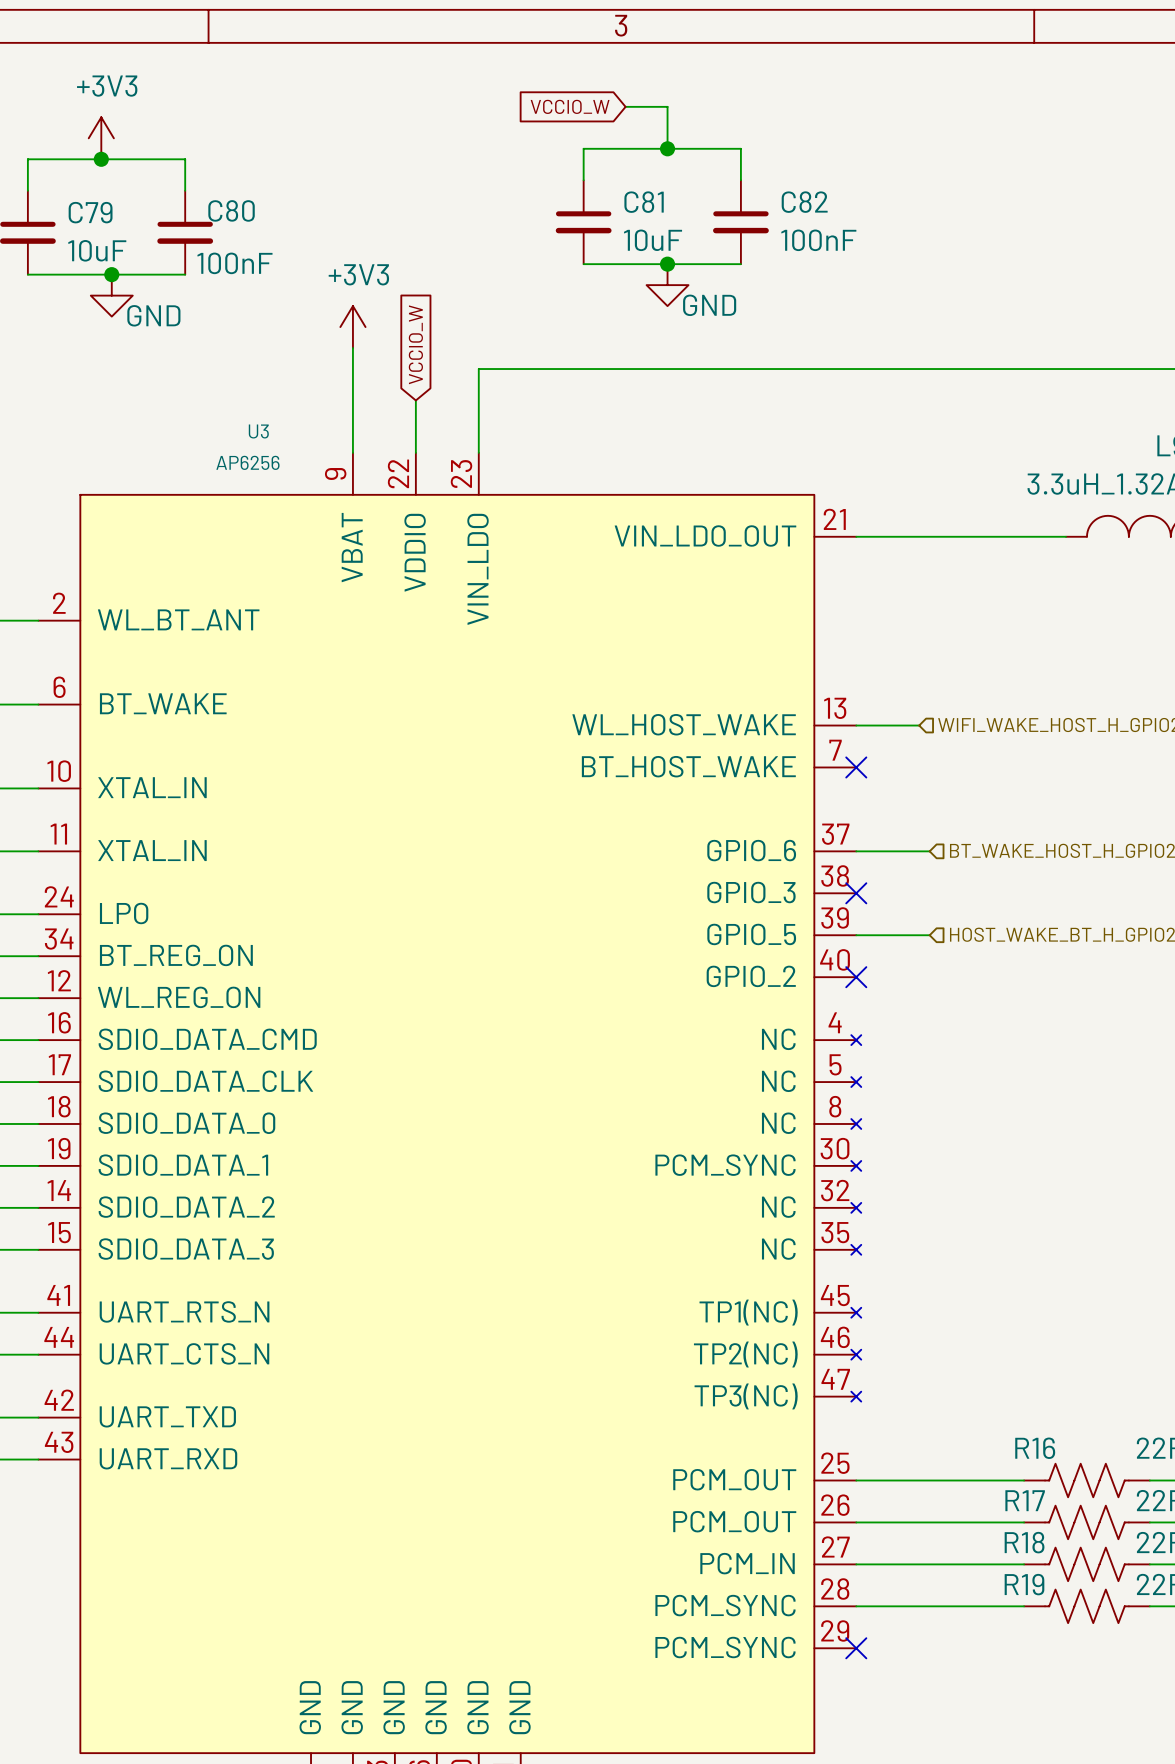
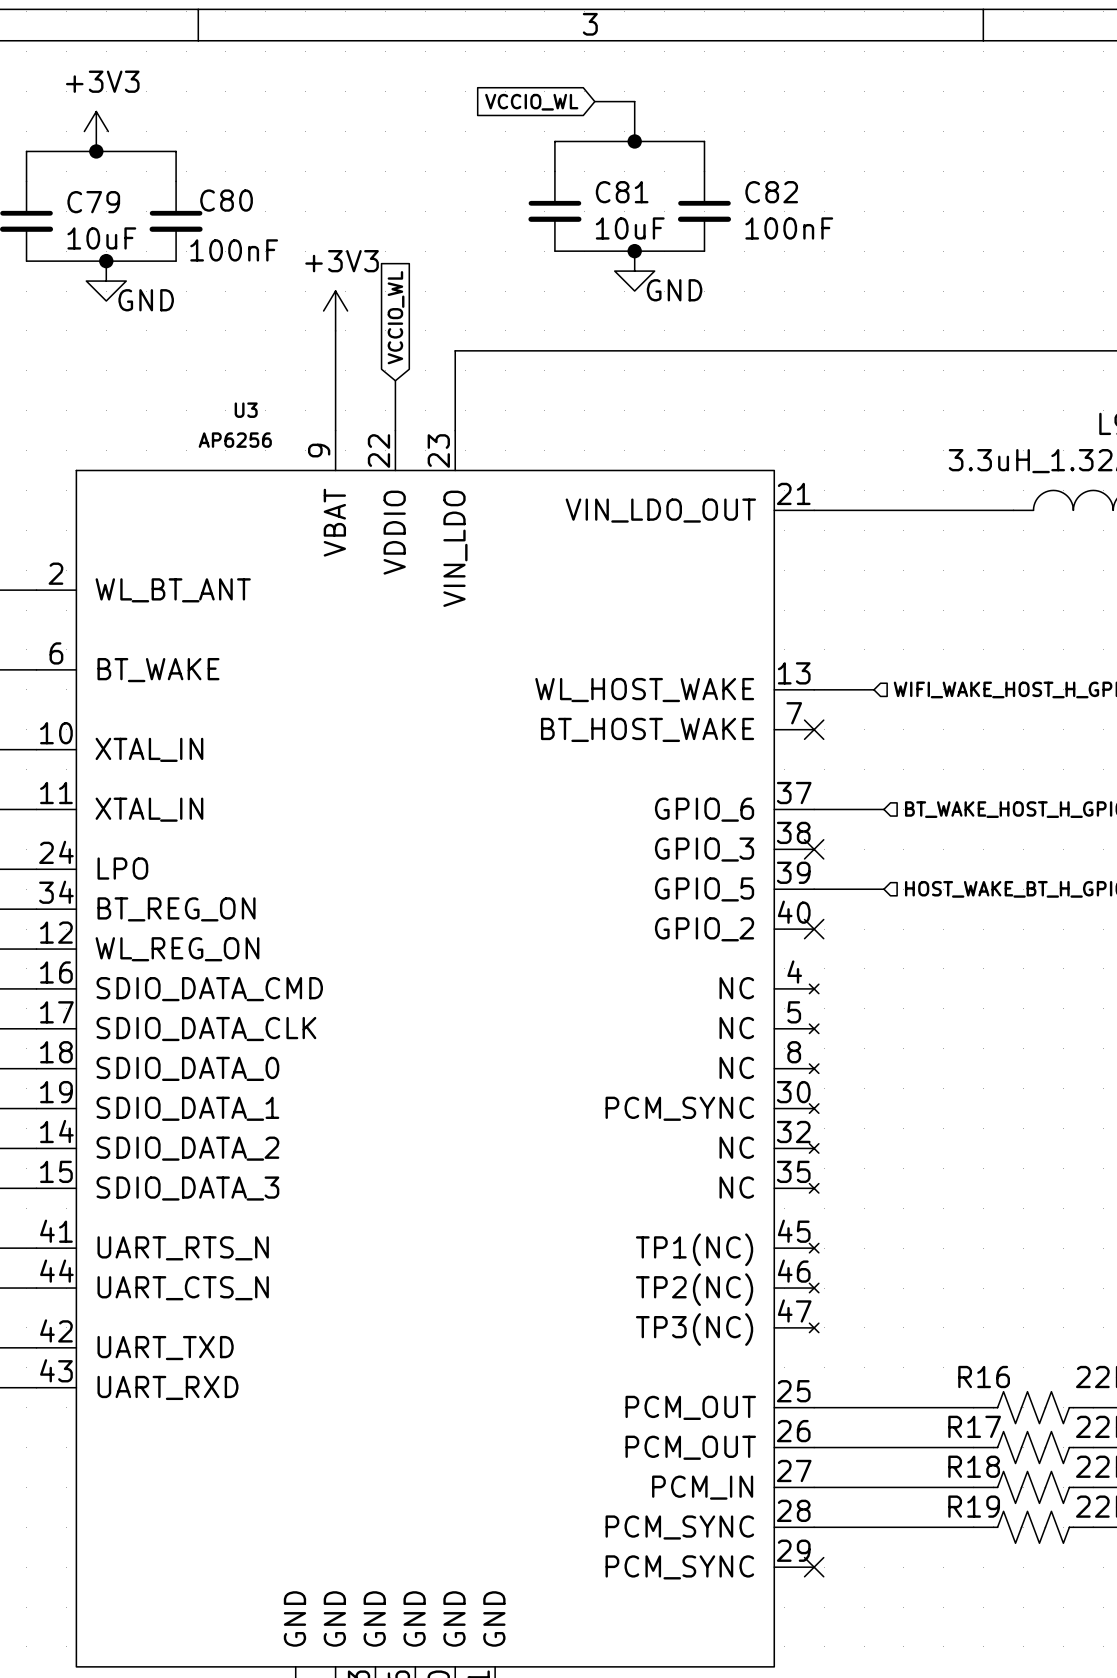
global label: VCCIO_W (570, 106) -> VCCIO_WL (531, 102)
global label: VCCIO_W (415, 344) -> VCCIO_WL (396, 317)

